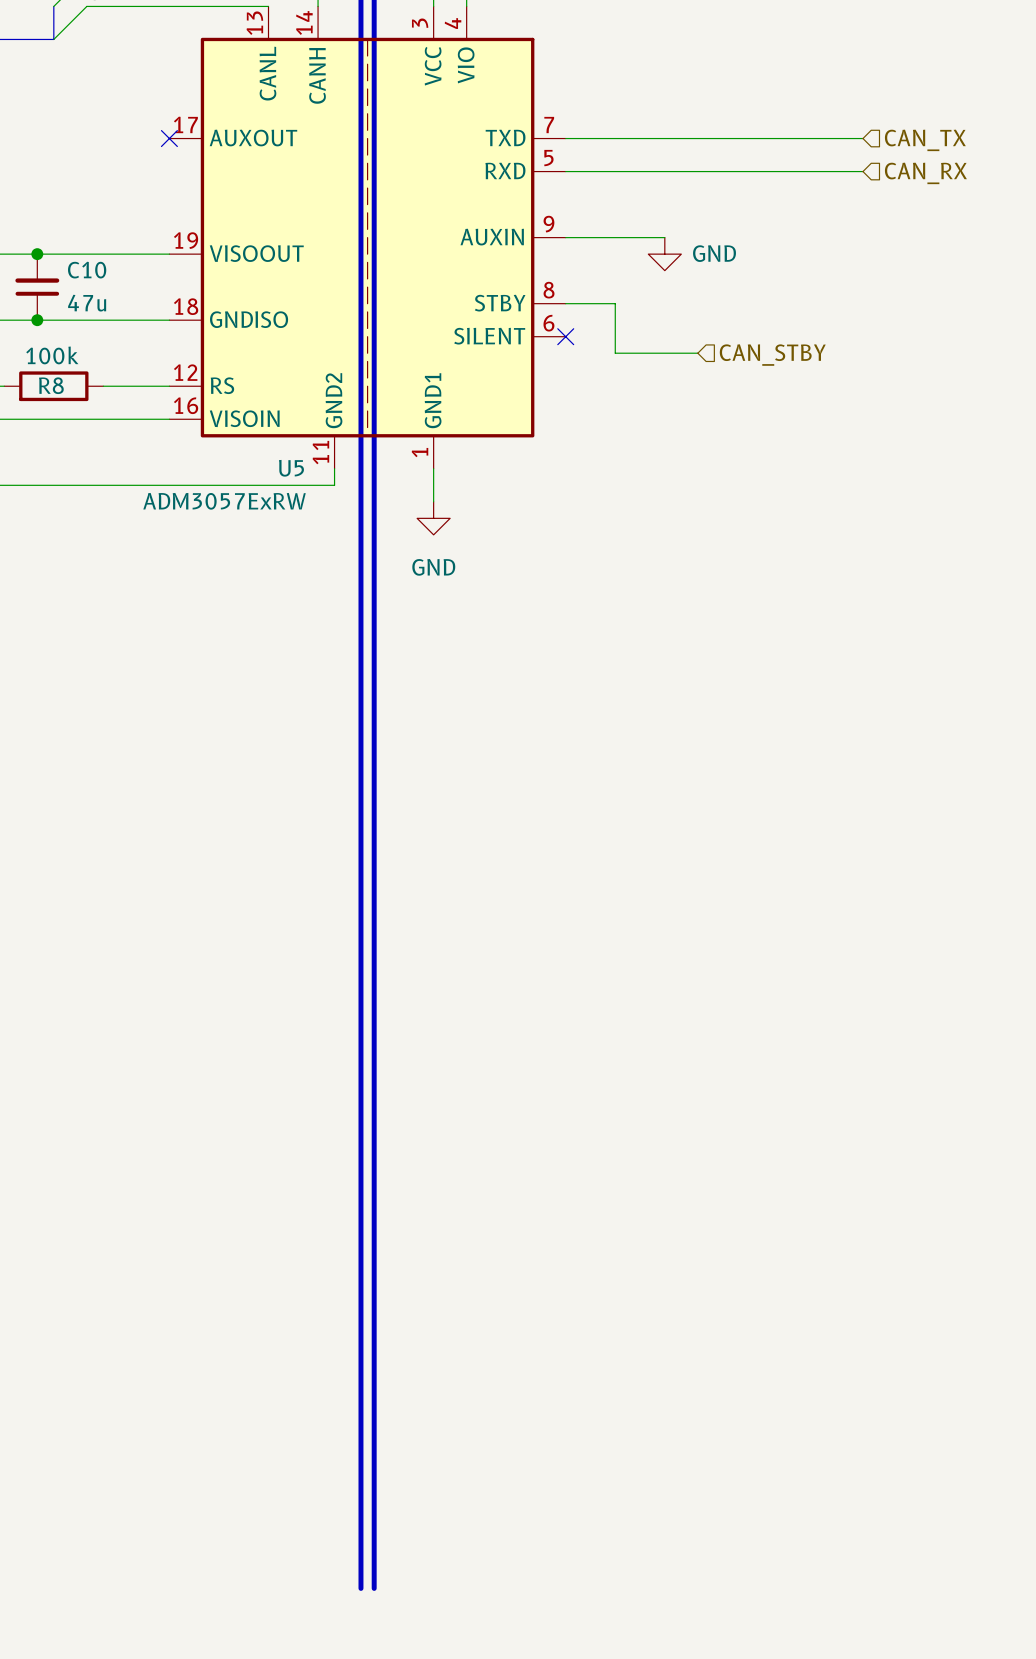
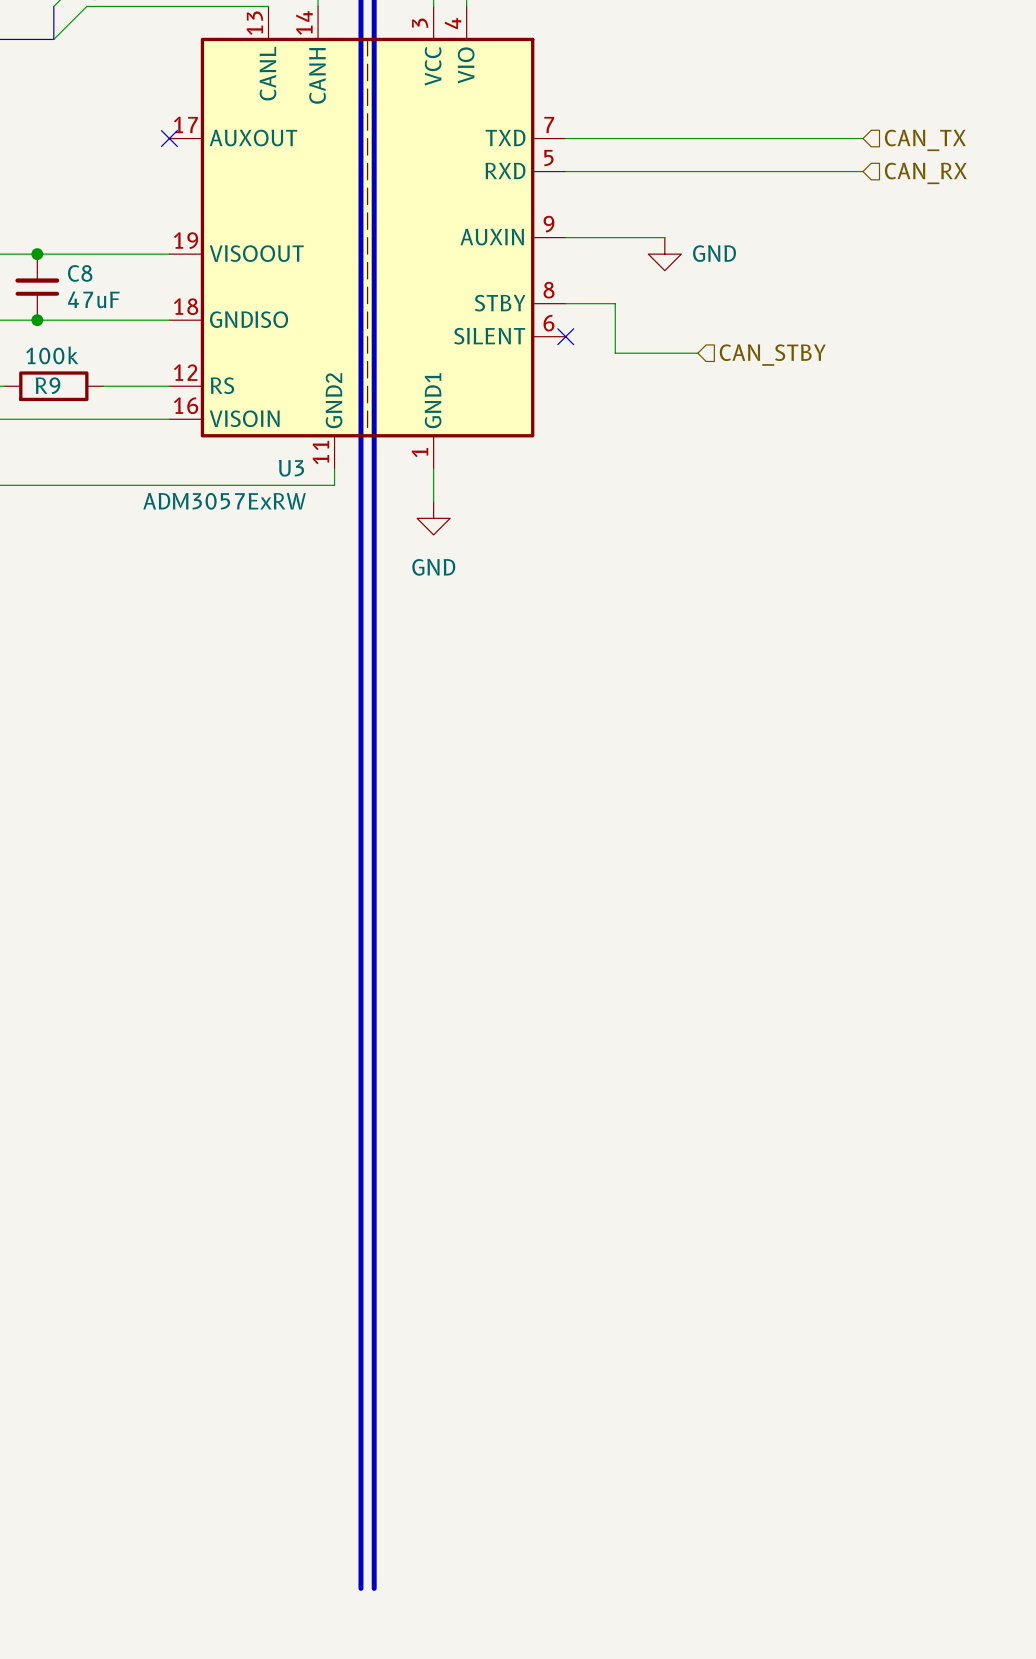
C10 name: C10 (87, 270) -> C8 (80, 273)
C10 value: 47u (87, 303) -> 47uF (93, 299)
R8 name: R8 (51, 385) -> R9 (48, 385)
U5 name: U5 (291, 468) -> U3 (291, 468)

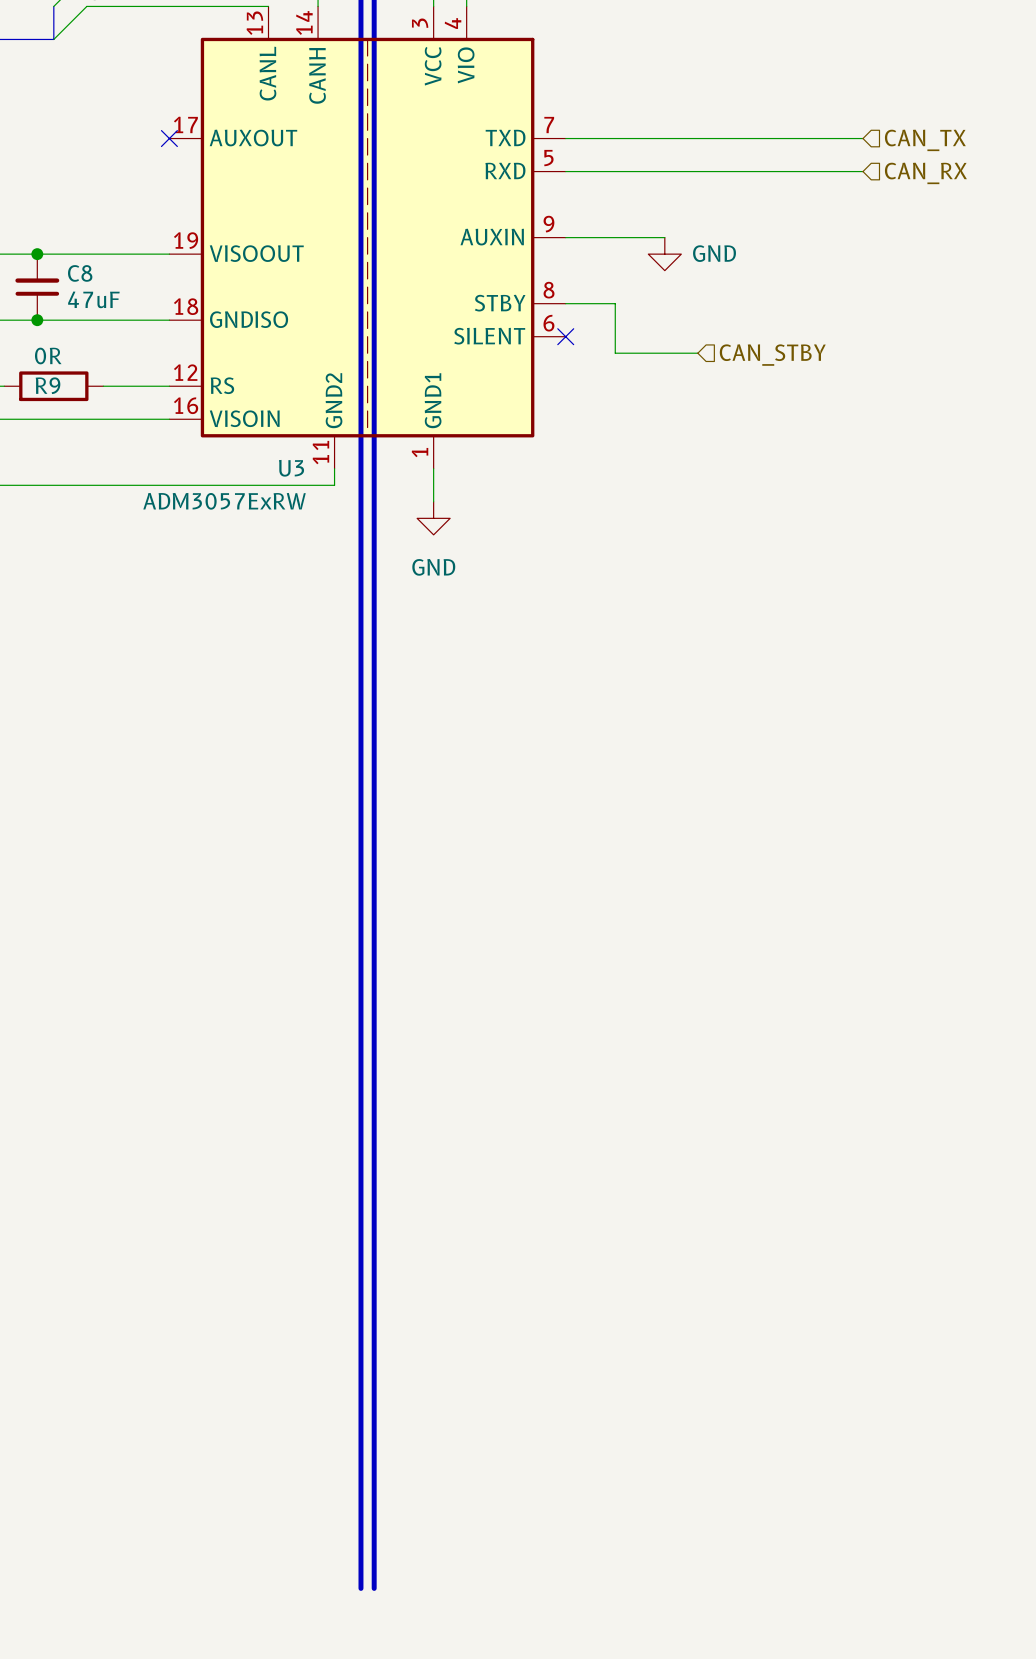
R9 value: 100k (52, 355) -> 0R (48, 356)

